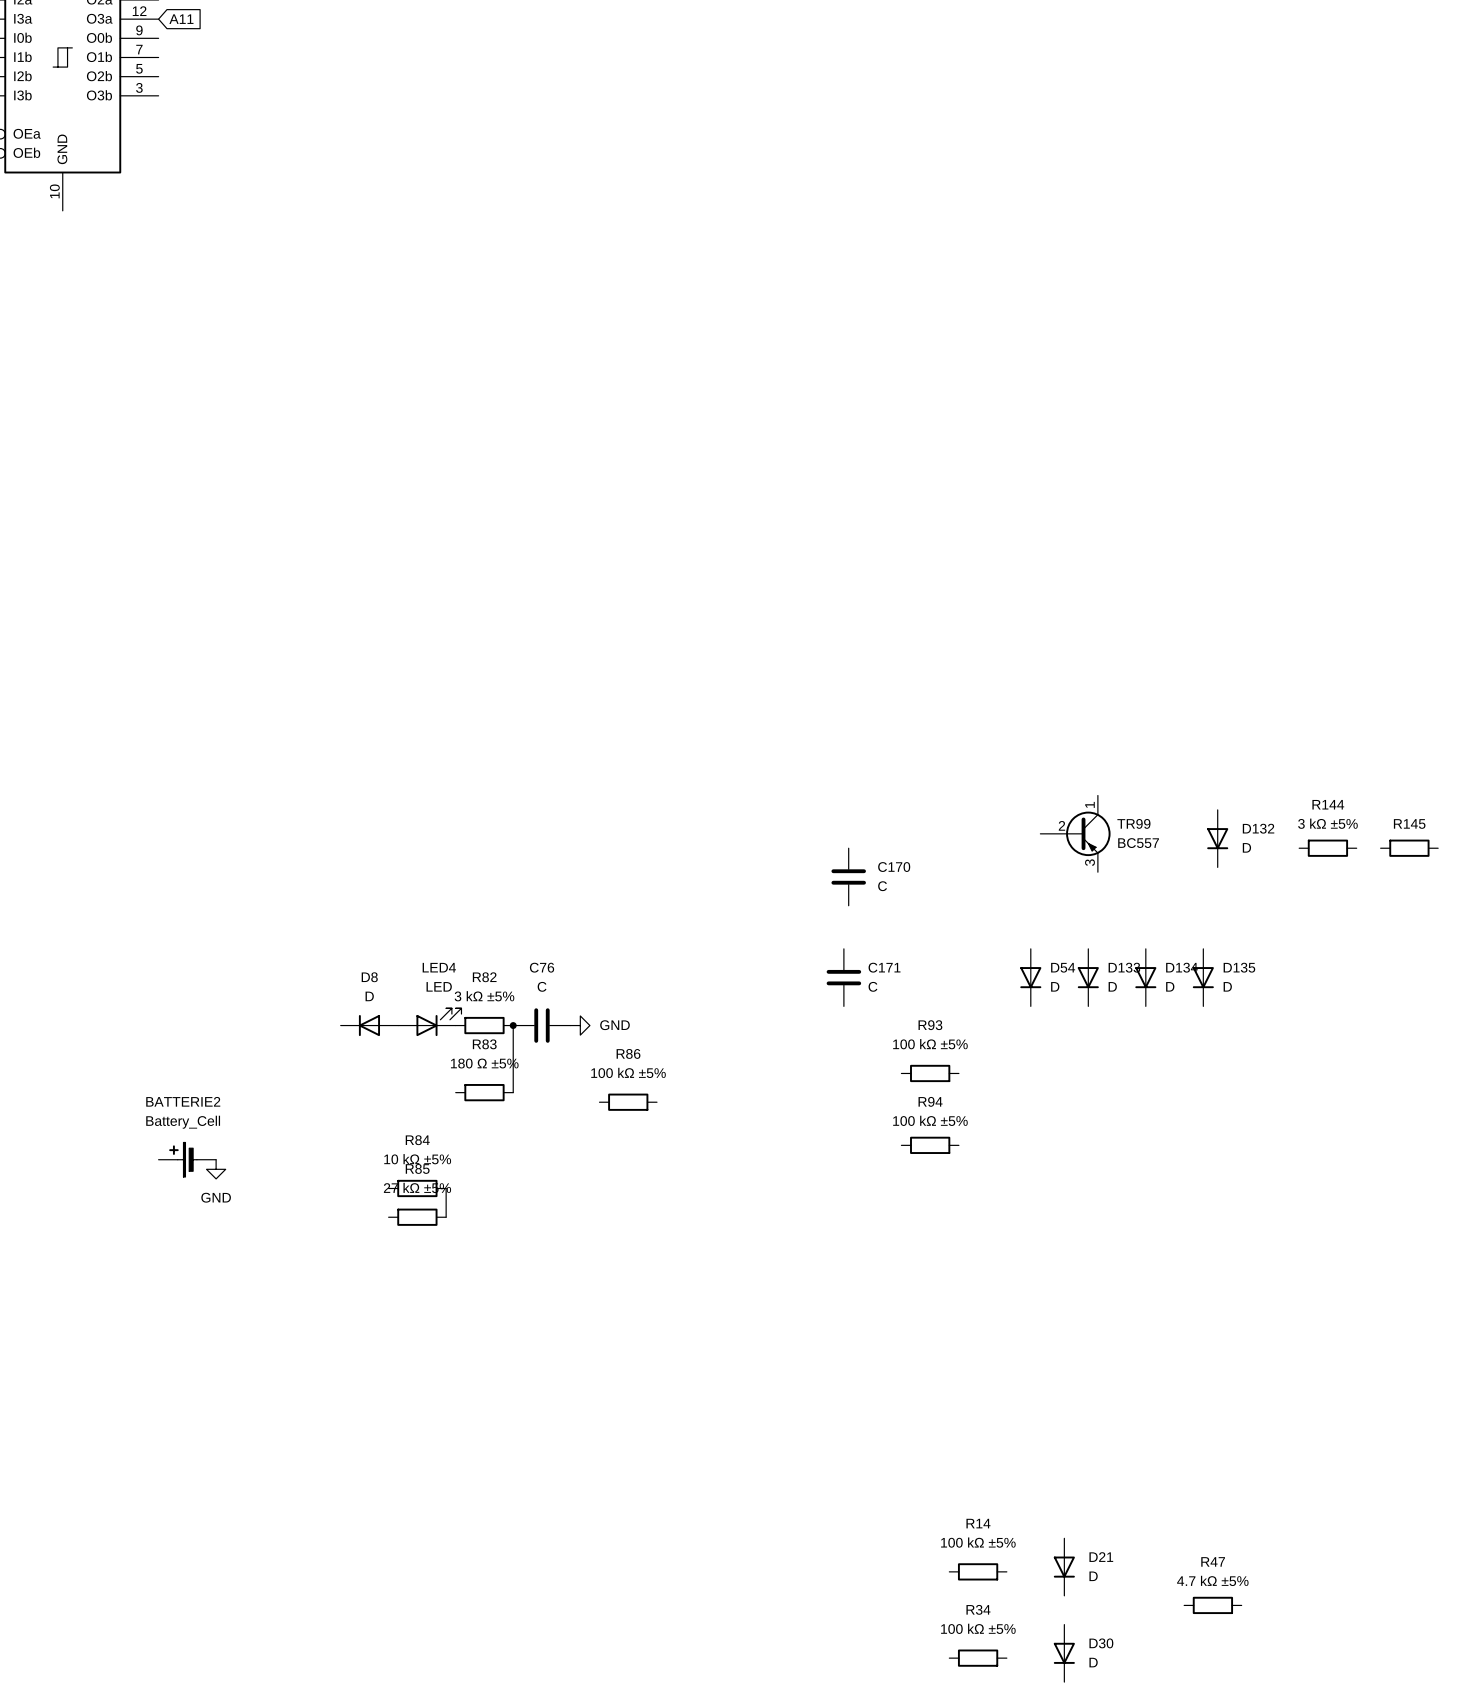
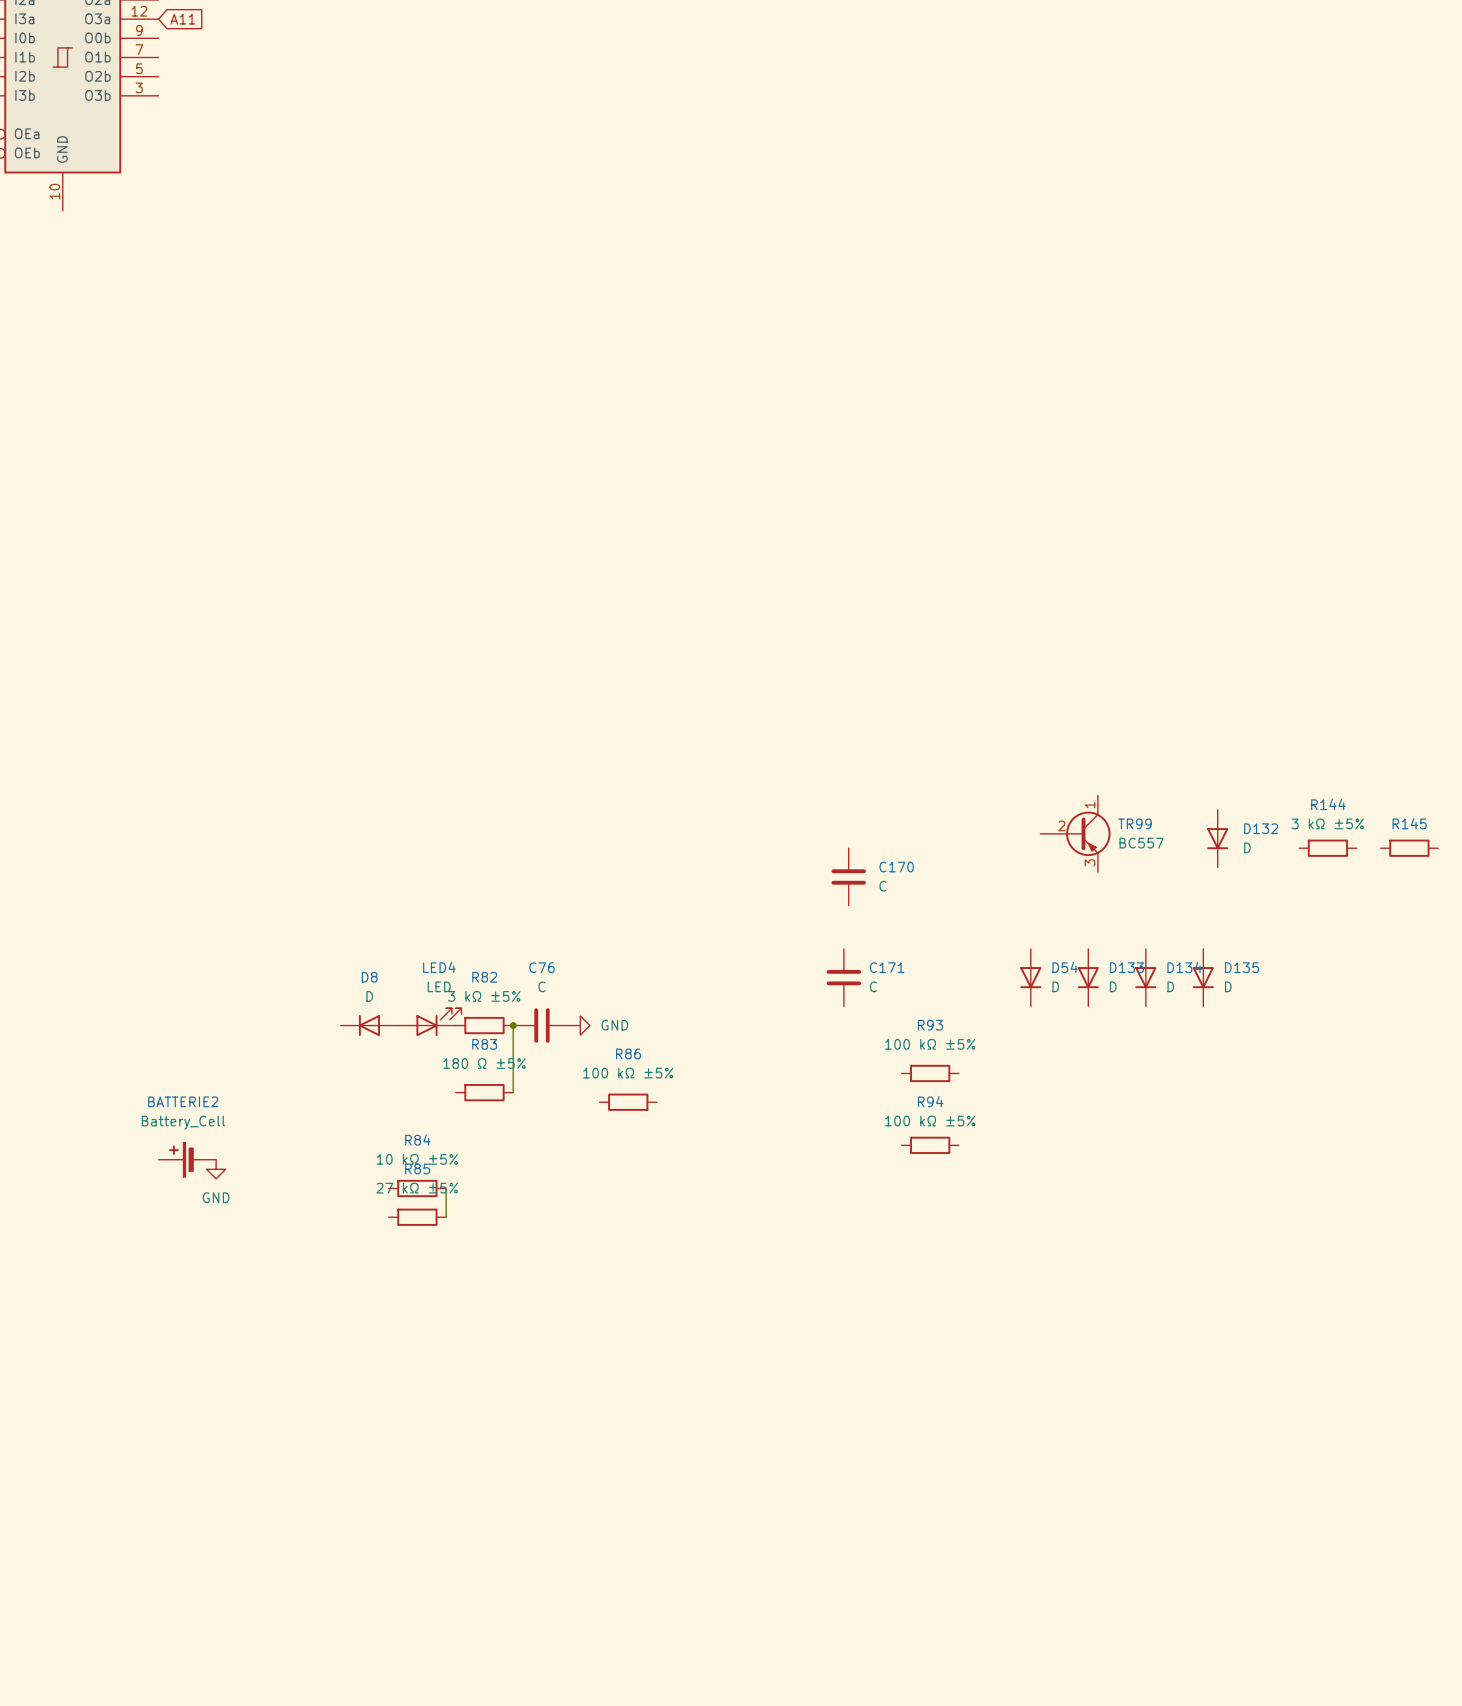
D21: D (1064, 1567) -> none
R14: 100 kΩ ±5% (978, 1571) -> none
R47: 4.7 kΩ ±5% (1212, 1605) -> none
D30: D (1064, 1653) -> none
R34: 100 kΩ ±5% (978, 1658) -> none

